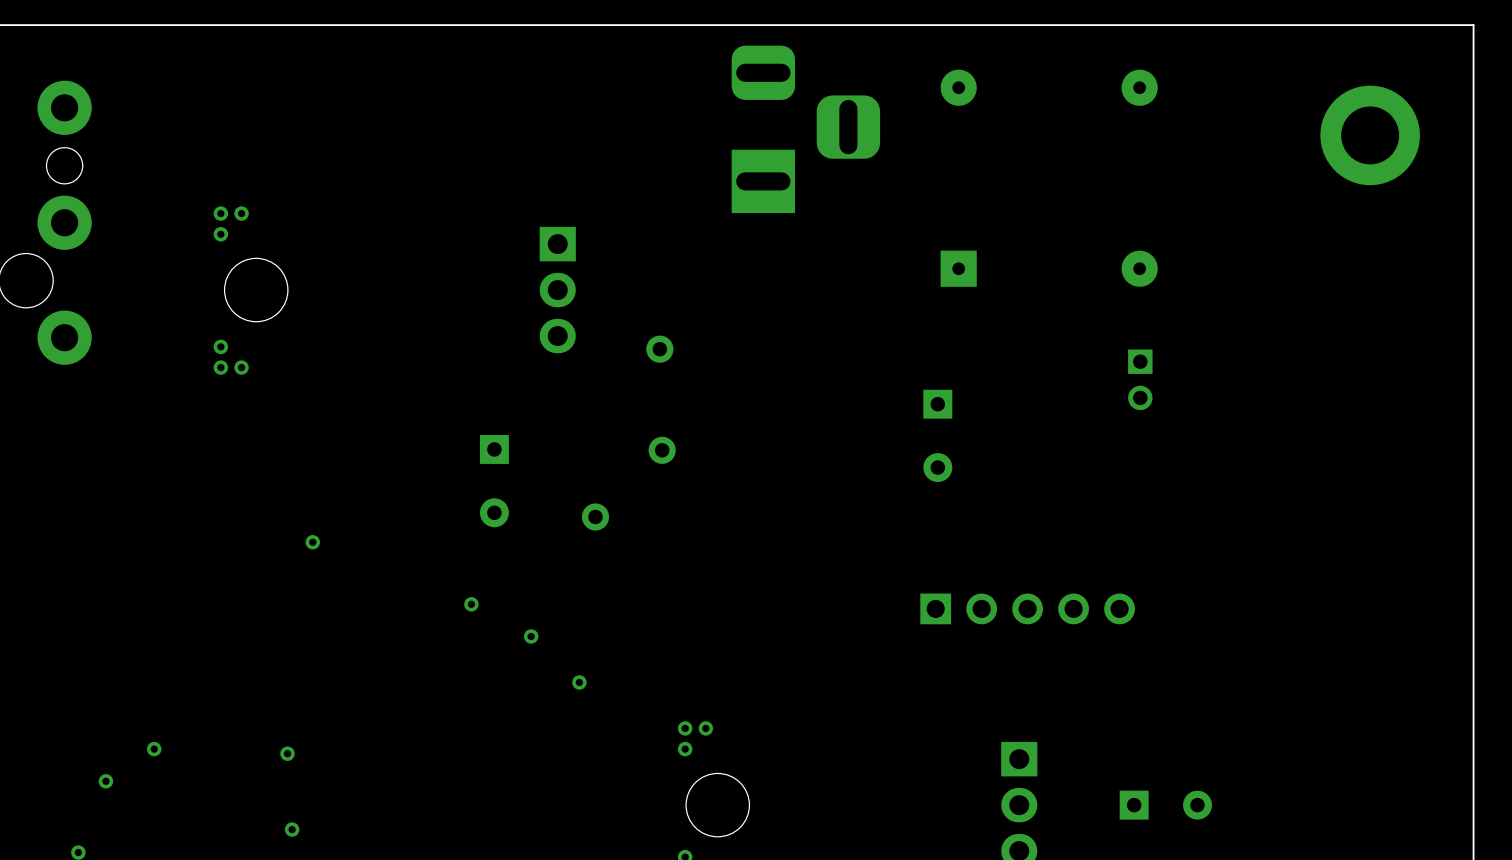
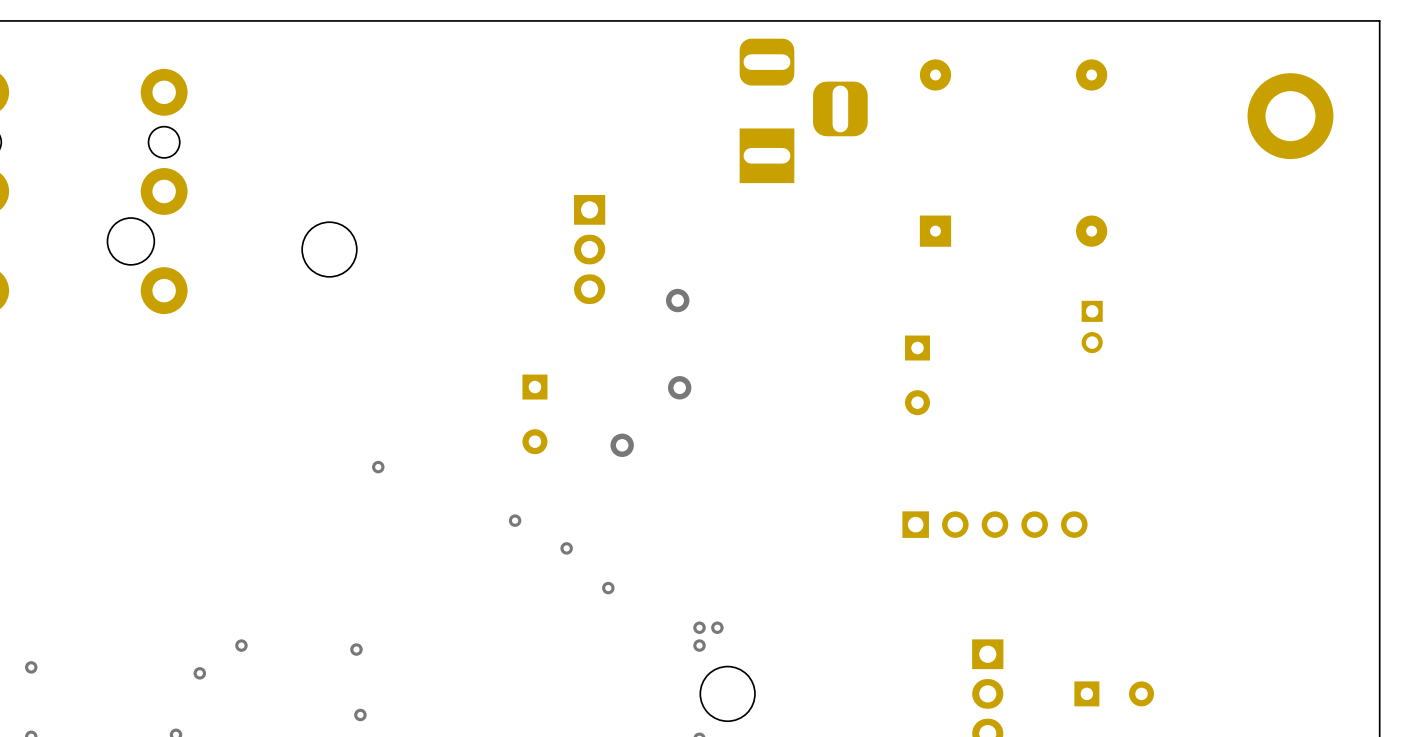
via: (220, 213) -> none
via: (241, 213) -> none
via: (220, 234) -> none
via: (220, 346) -> none
via: (220, 367) -> none
via: (241, 367) -> none

